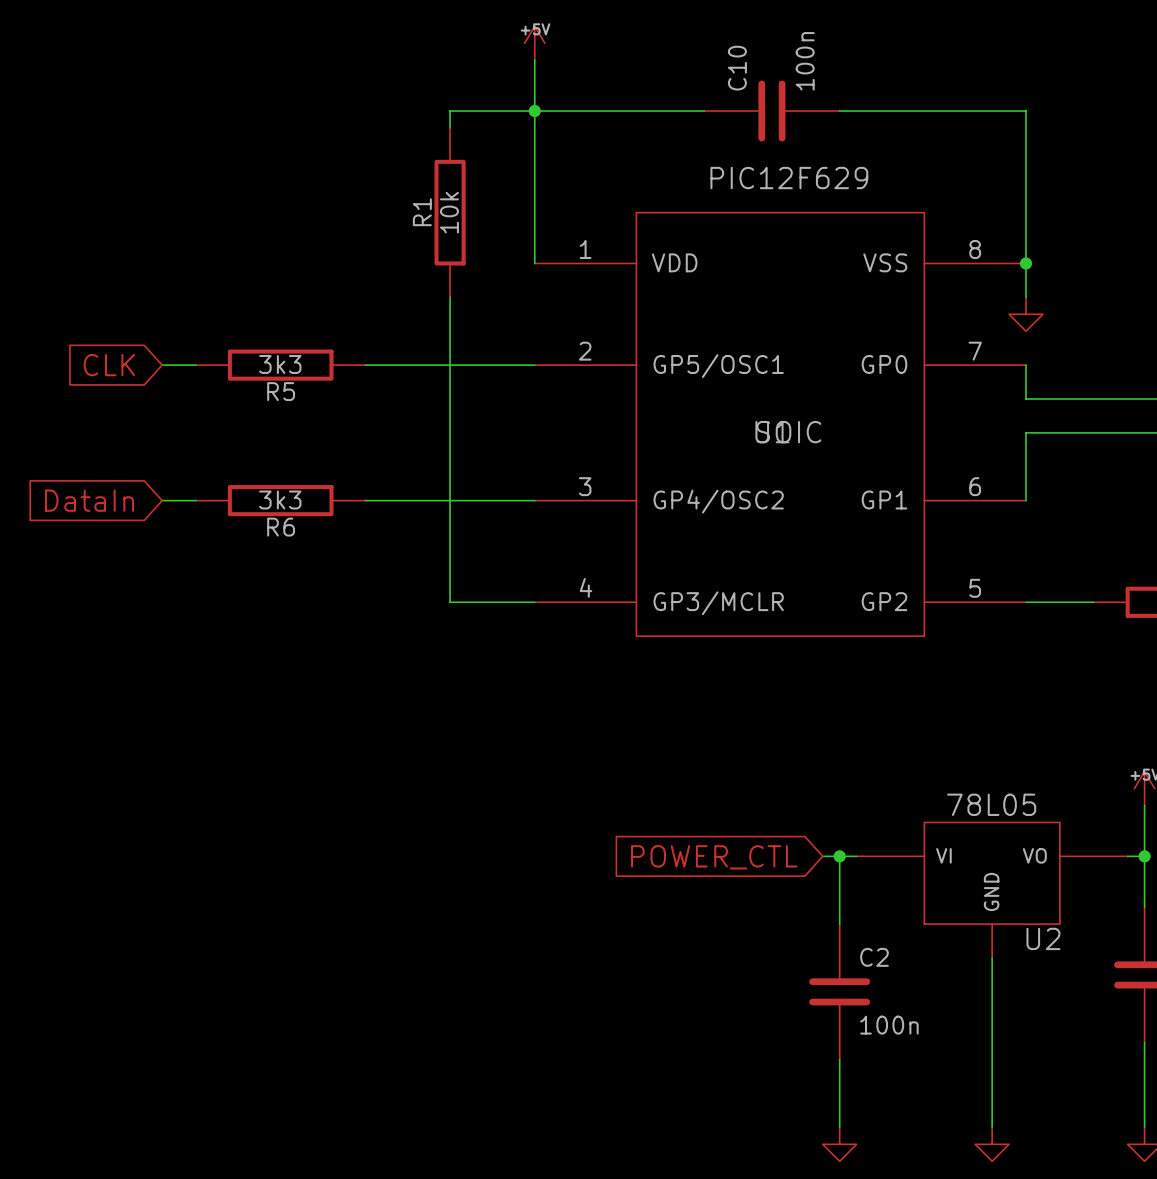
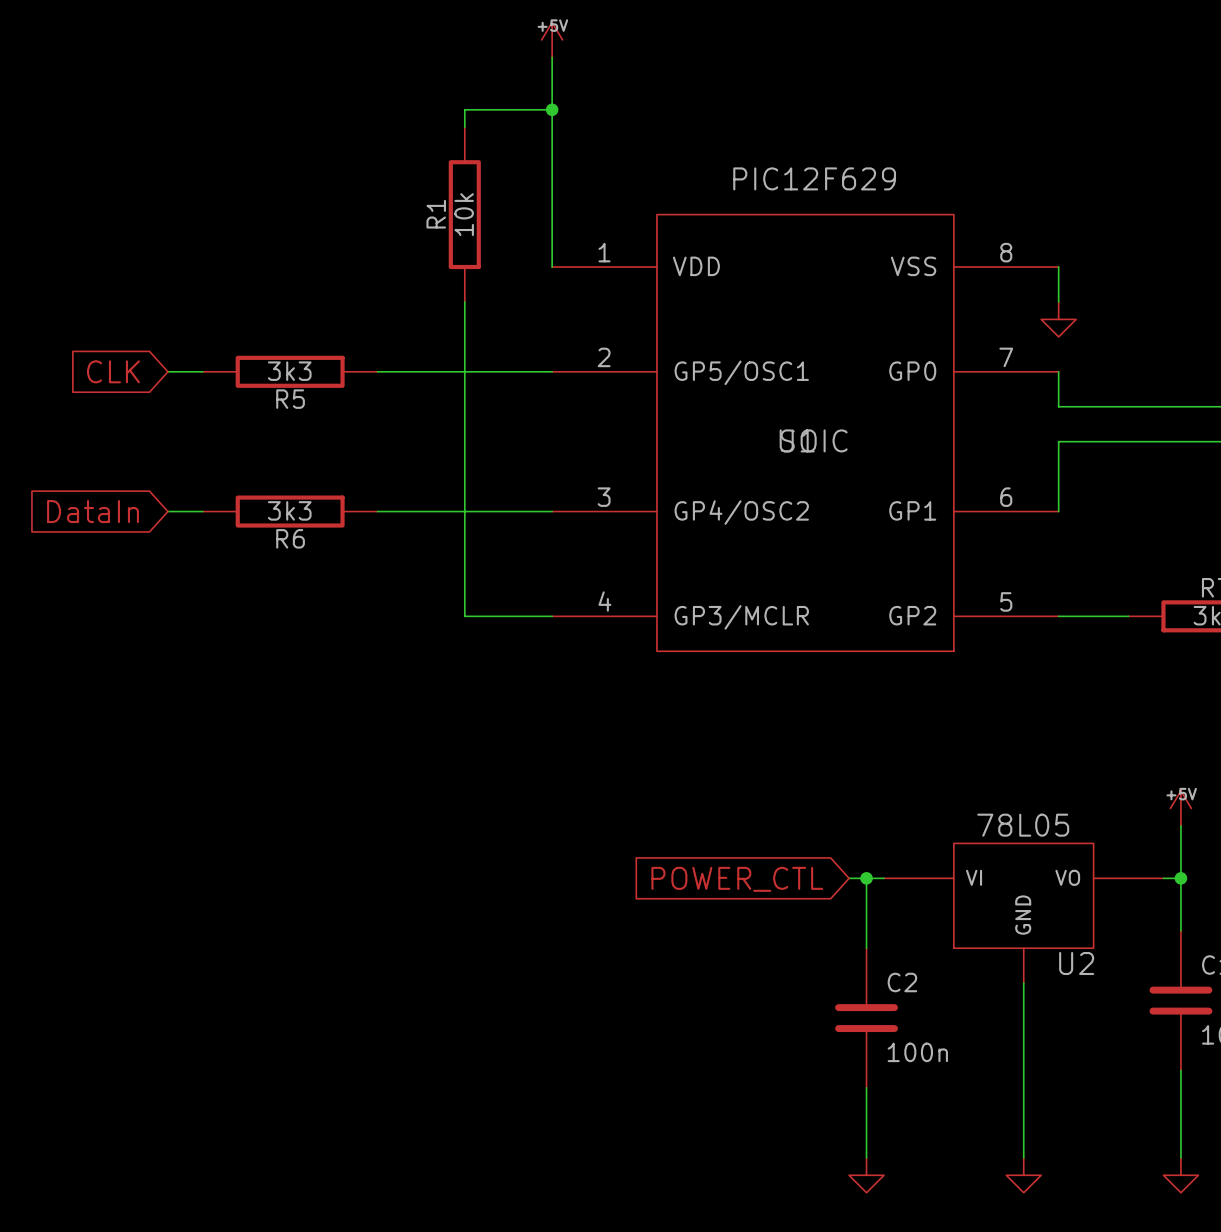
wire: (534, 111) (704, 111) -> none
C10: 100n (771, 111) -> none
wire: (839, 111) (1026, 111) (1026, 263) -> none
junction: (1026, 263) -> none

